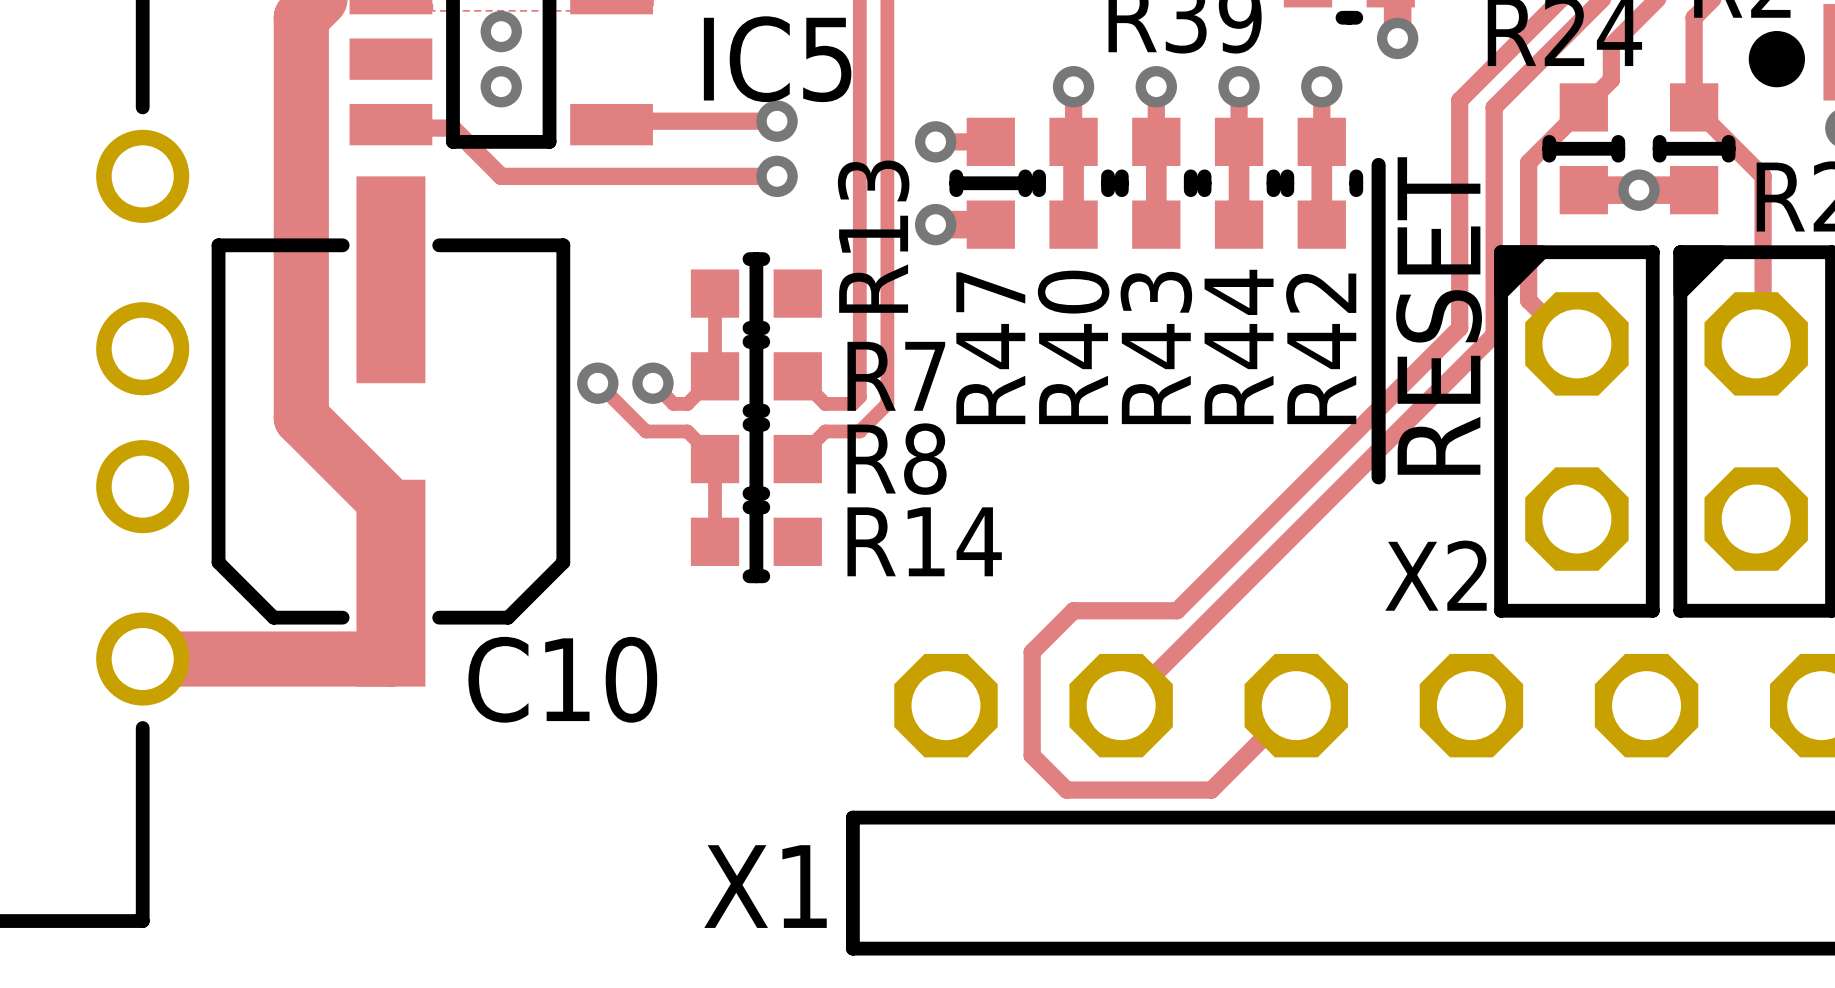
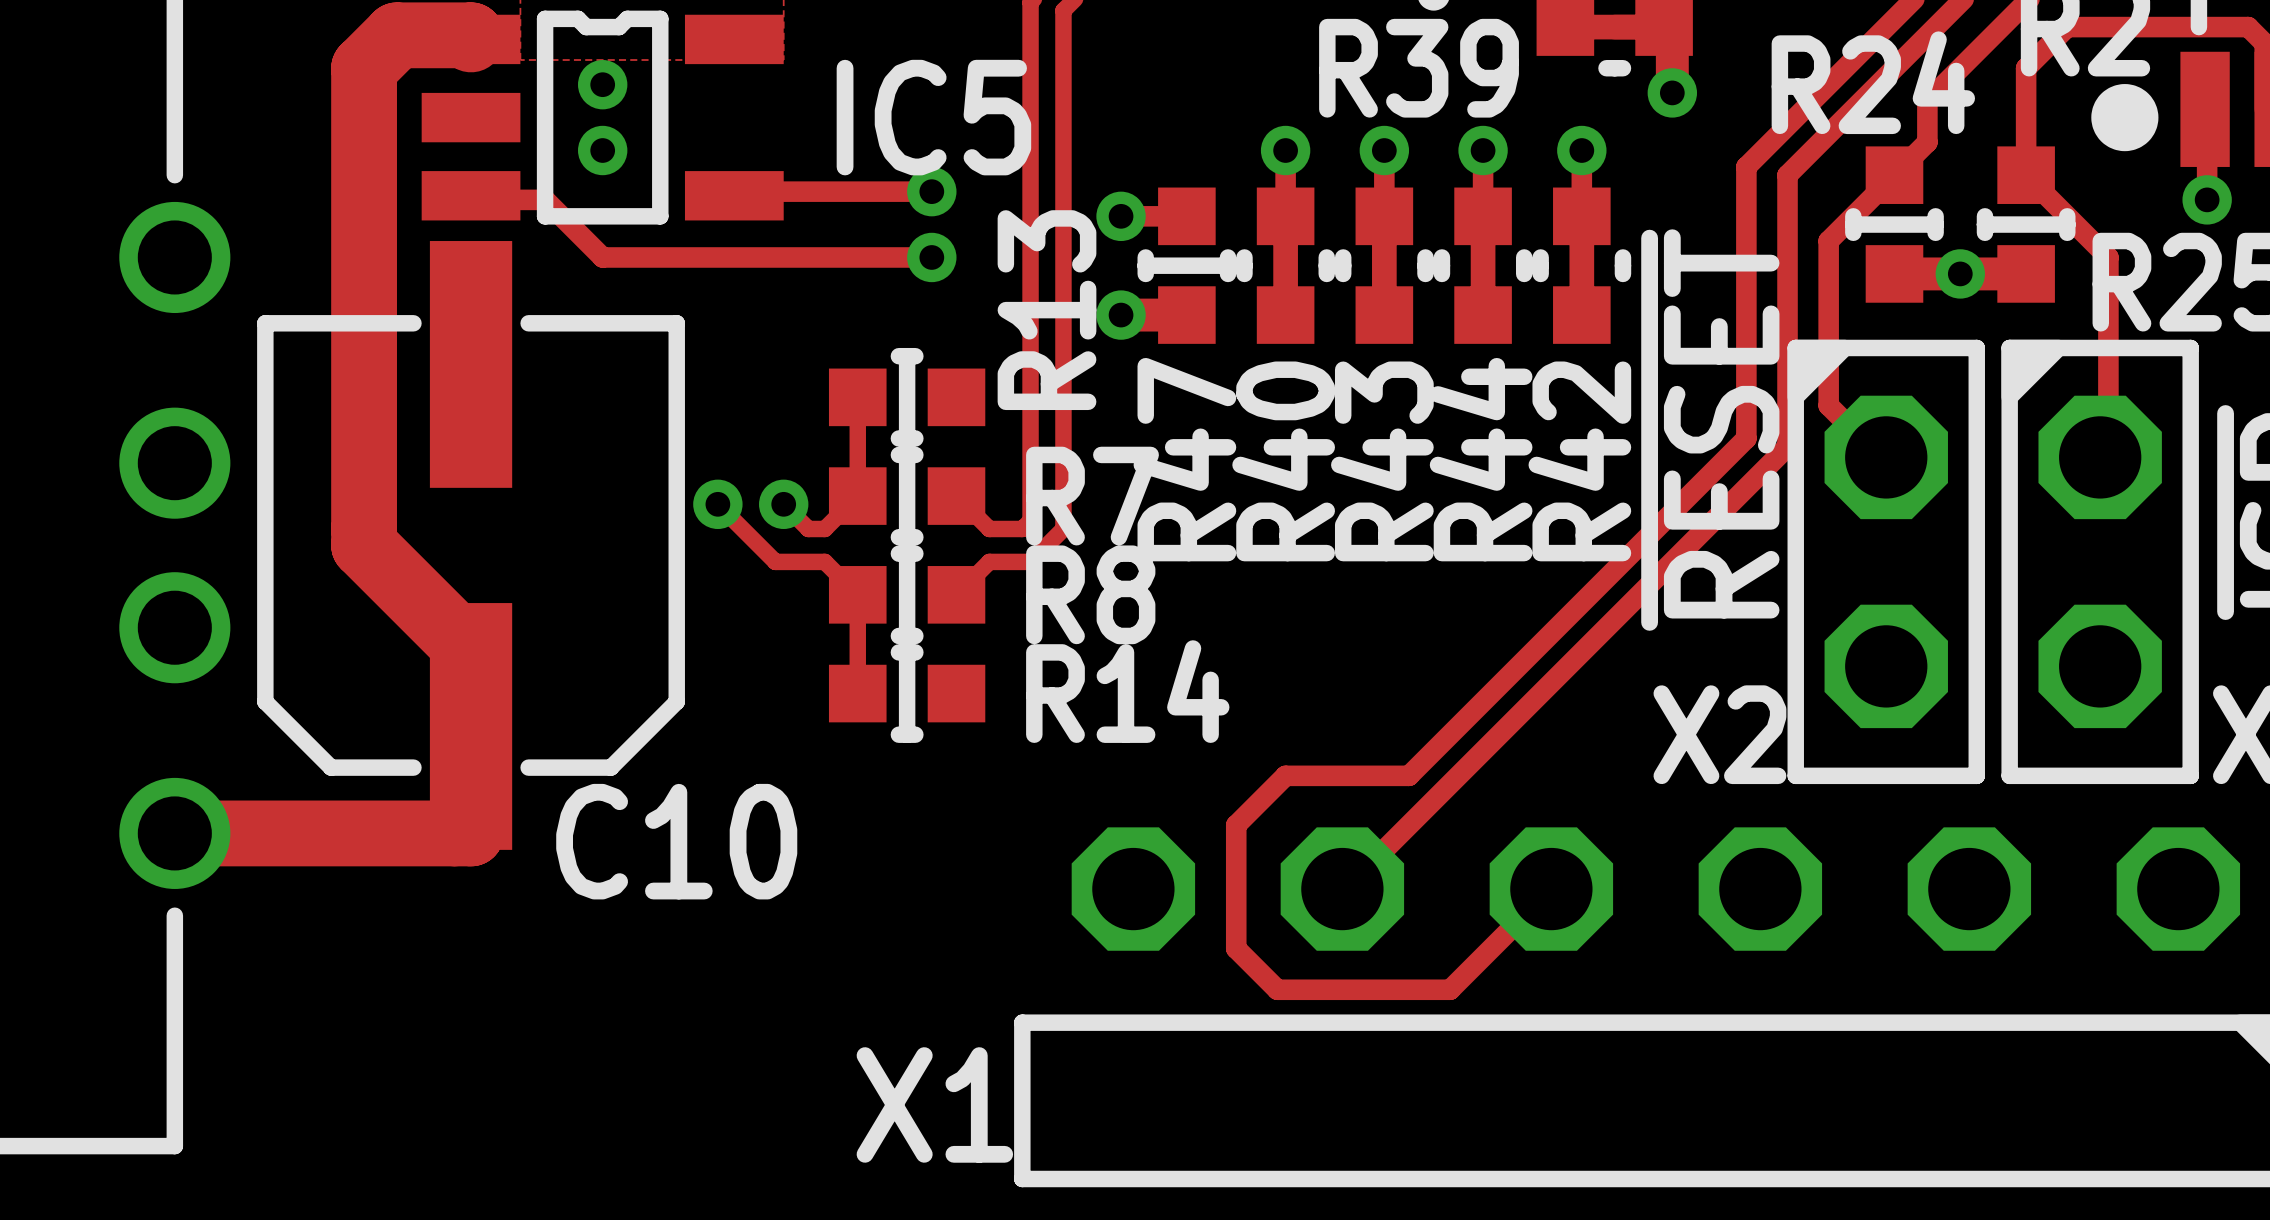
C10 position: (390, 431) -> (471, 545)

